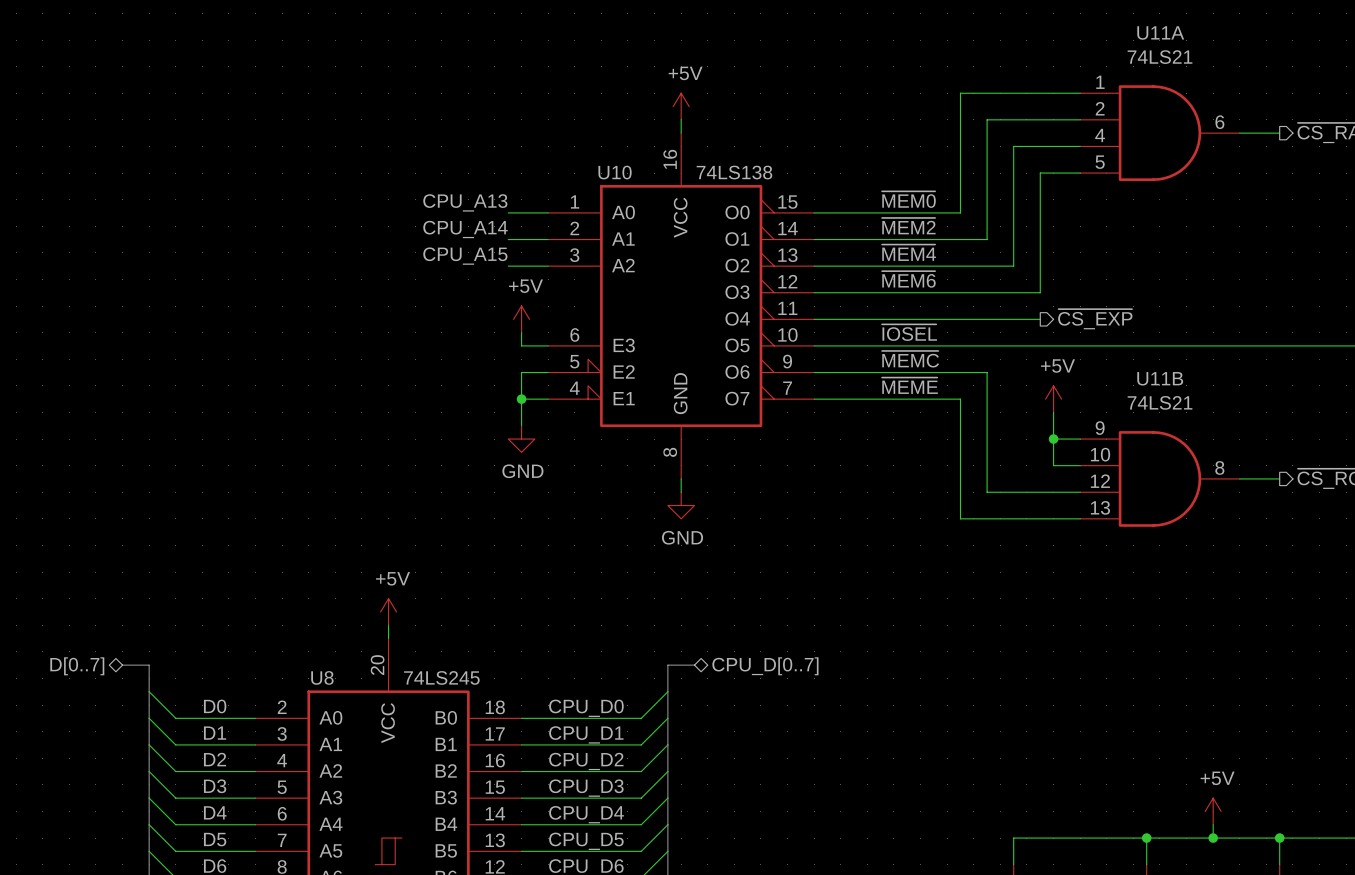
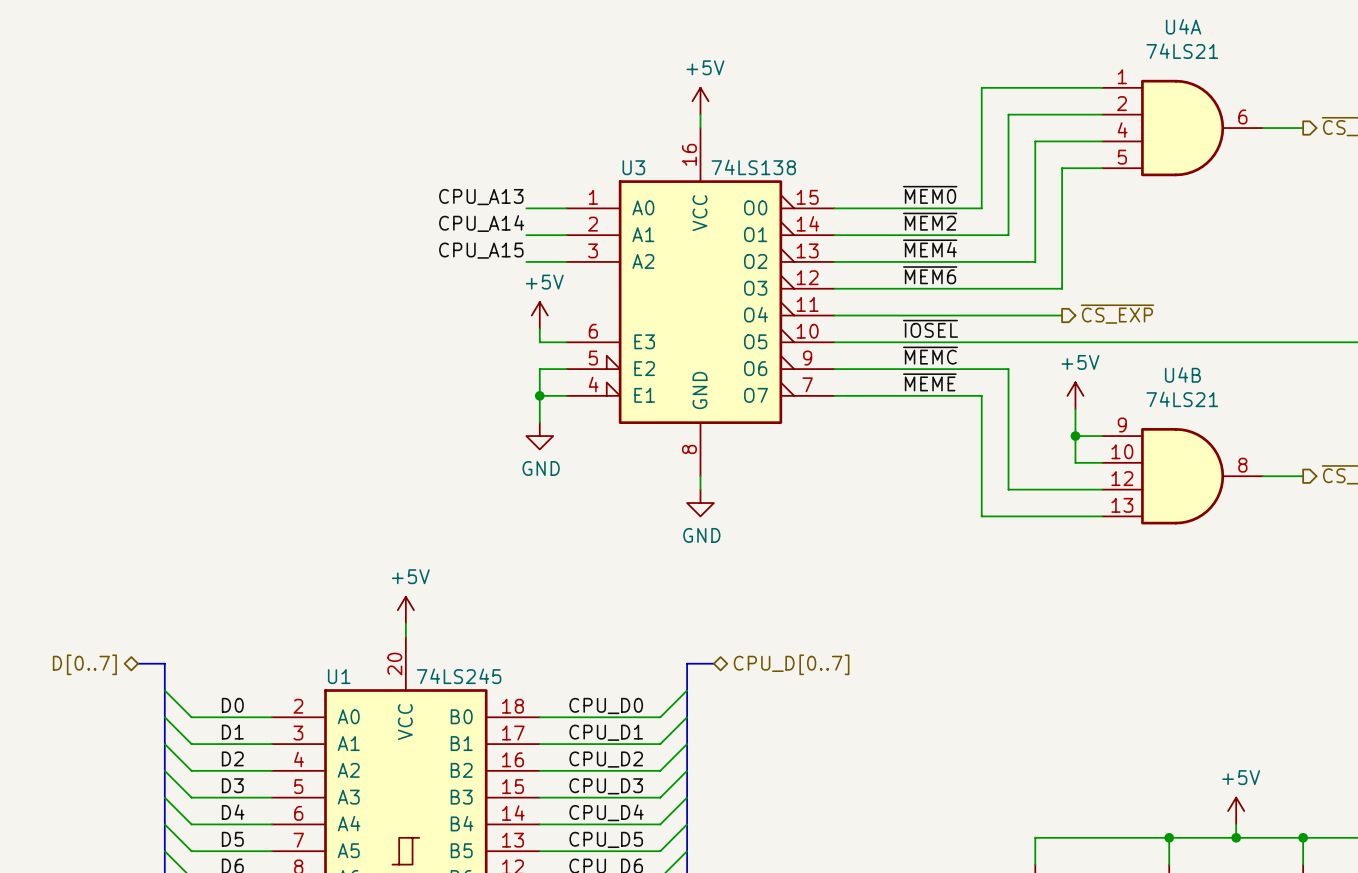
U11A name: U11A (1160, 32) -> U4A (1183, 26)
U10 name: U10 (615, 172) -> U3 (633, 167)
U11B name: U11B (1160, 378) -> U4B (1182, 374)
U8 name: U8 (322, 677) -> U1 (339, 676)

